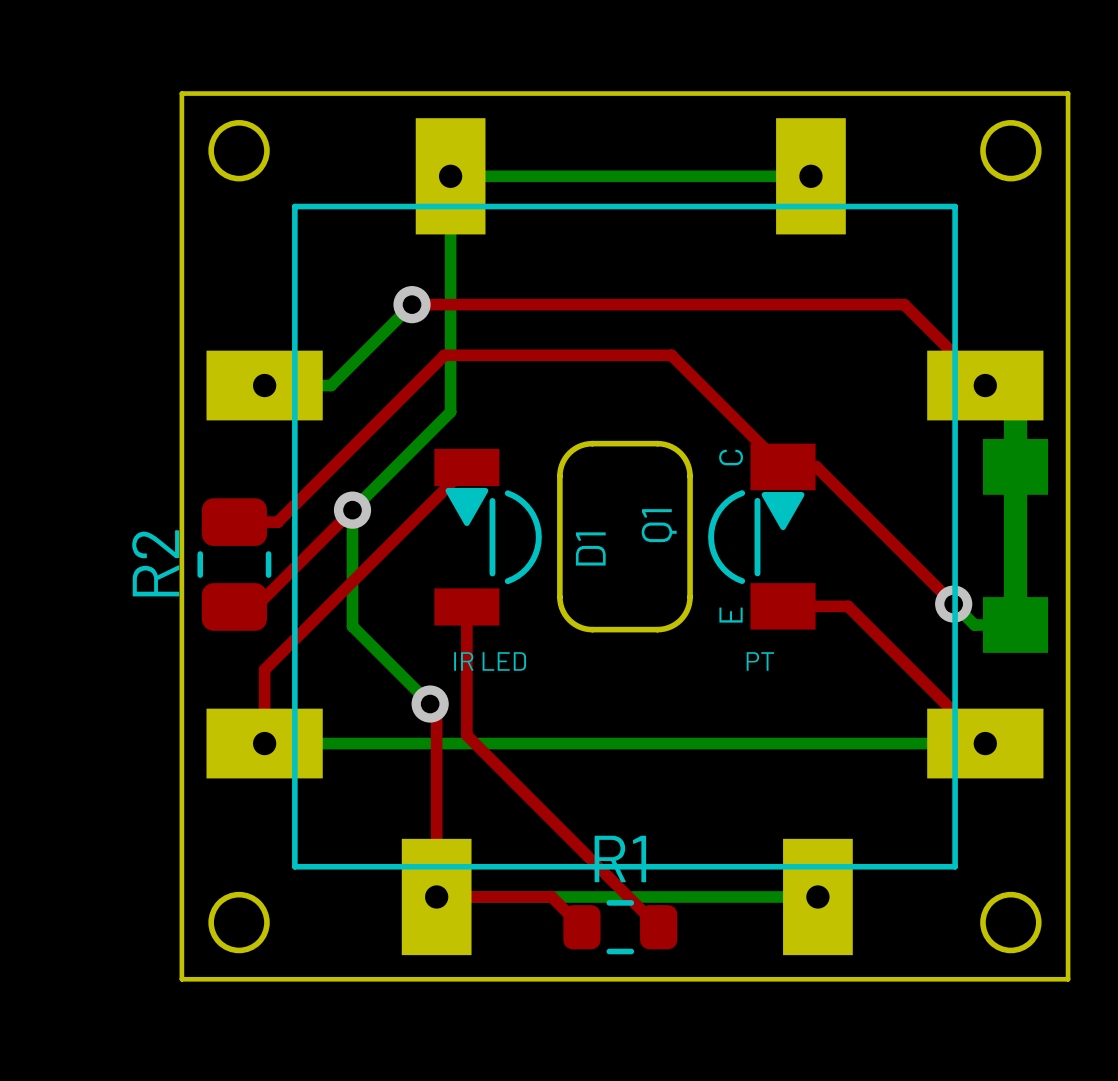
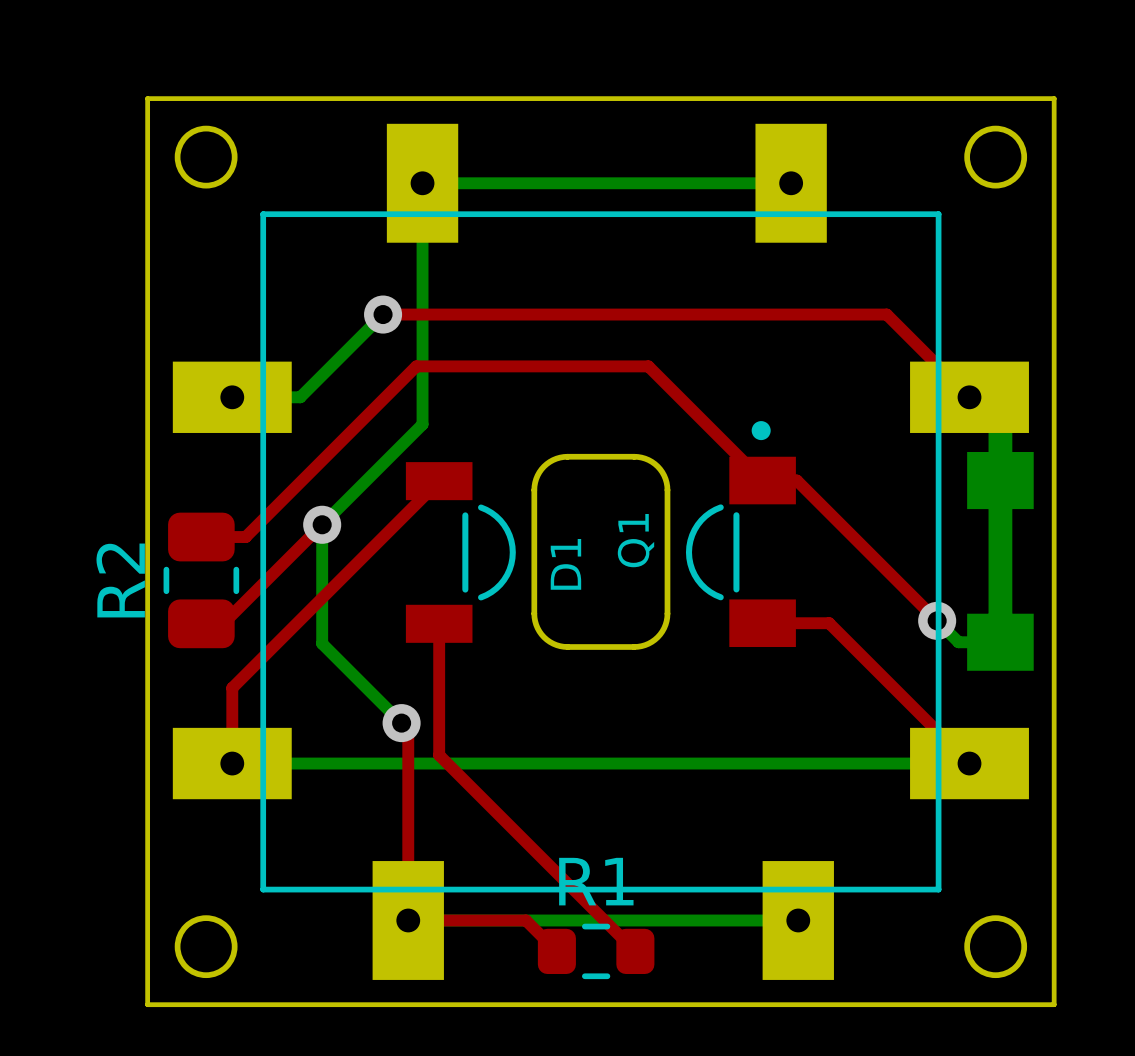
Q1 footprint: [708, 443, 816, 630] -> [685, 421, 796, 648]
D1 footprint: [434, 448, 542, 626] -> [405, 462, 516, 643]
text: IR LED (490, 661) -> none
text: PT (760, 661) -> none

